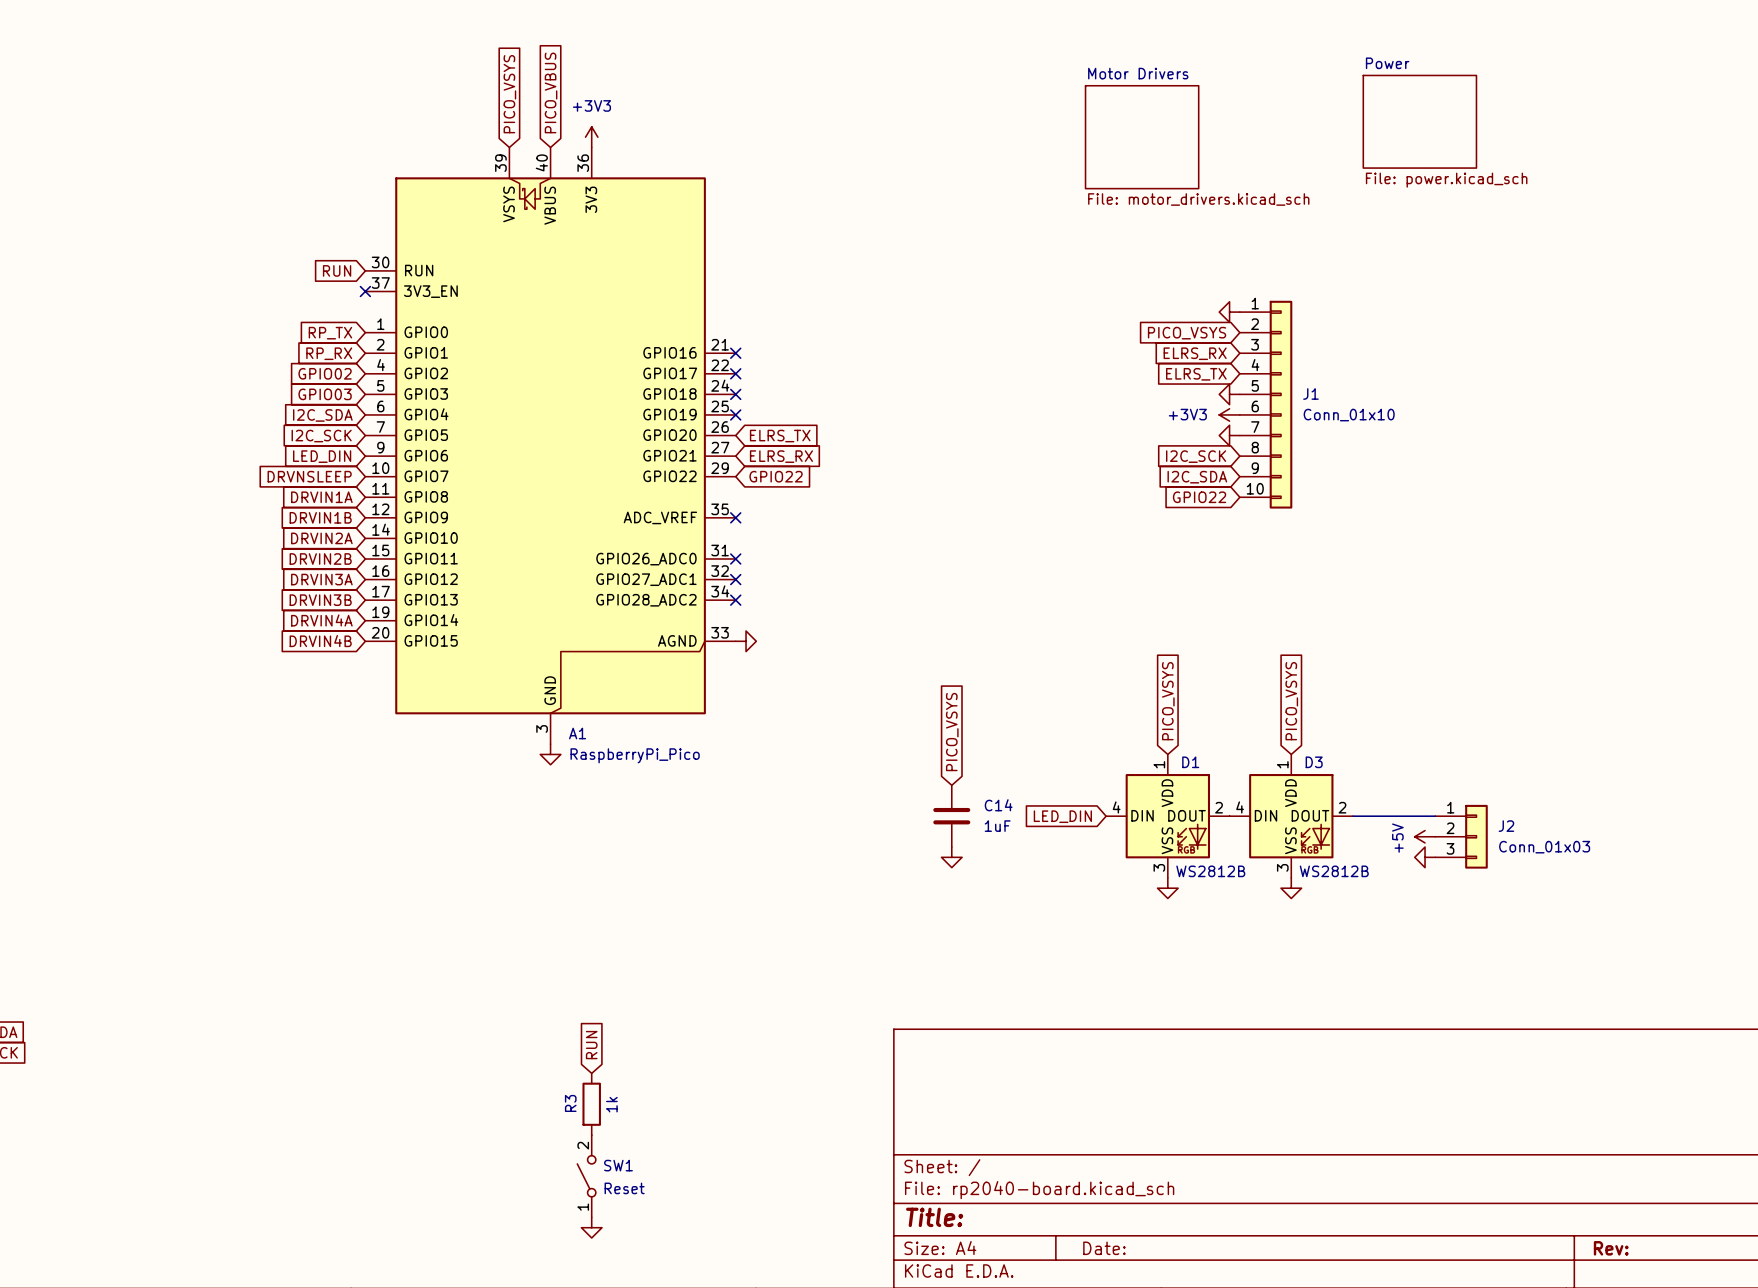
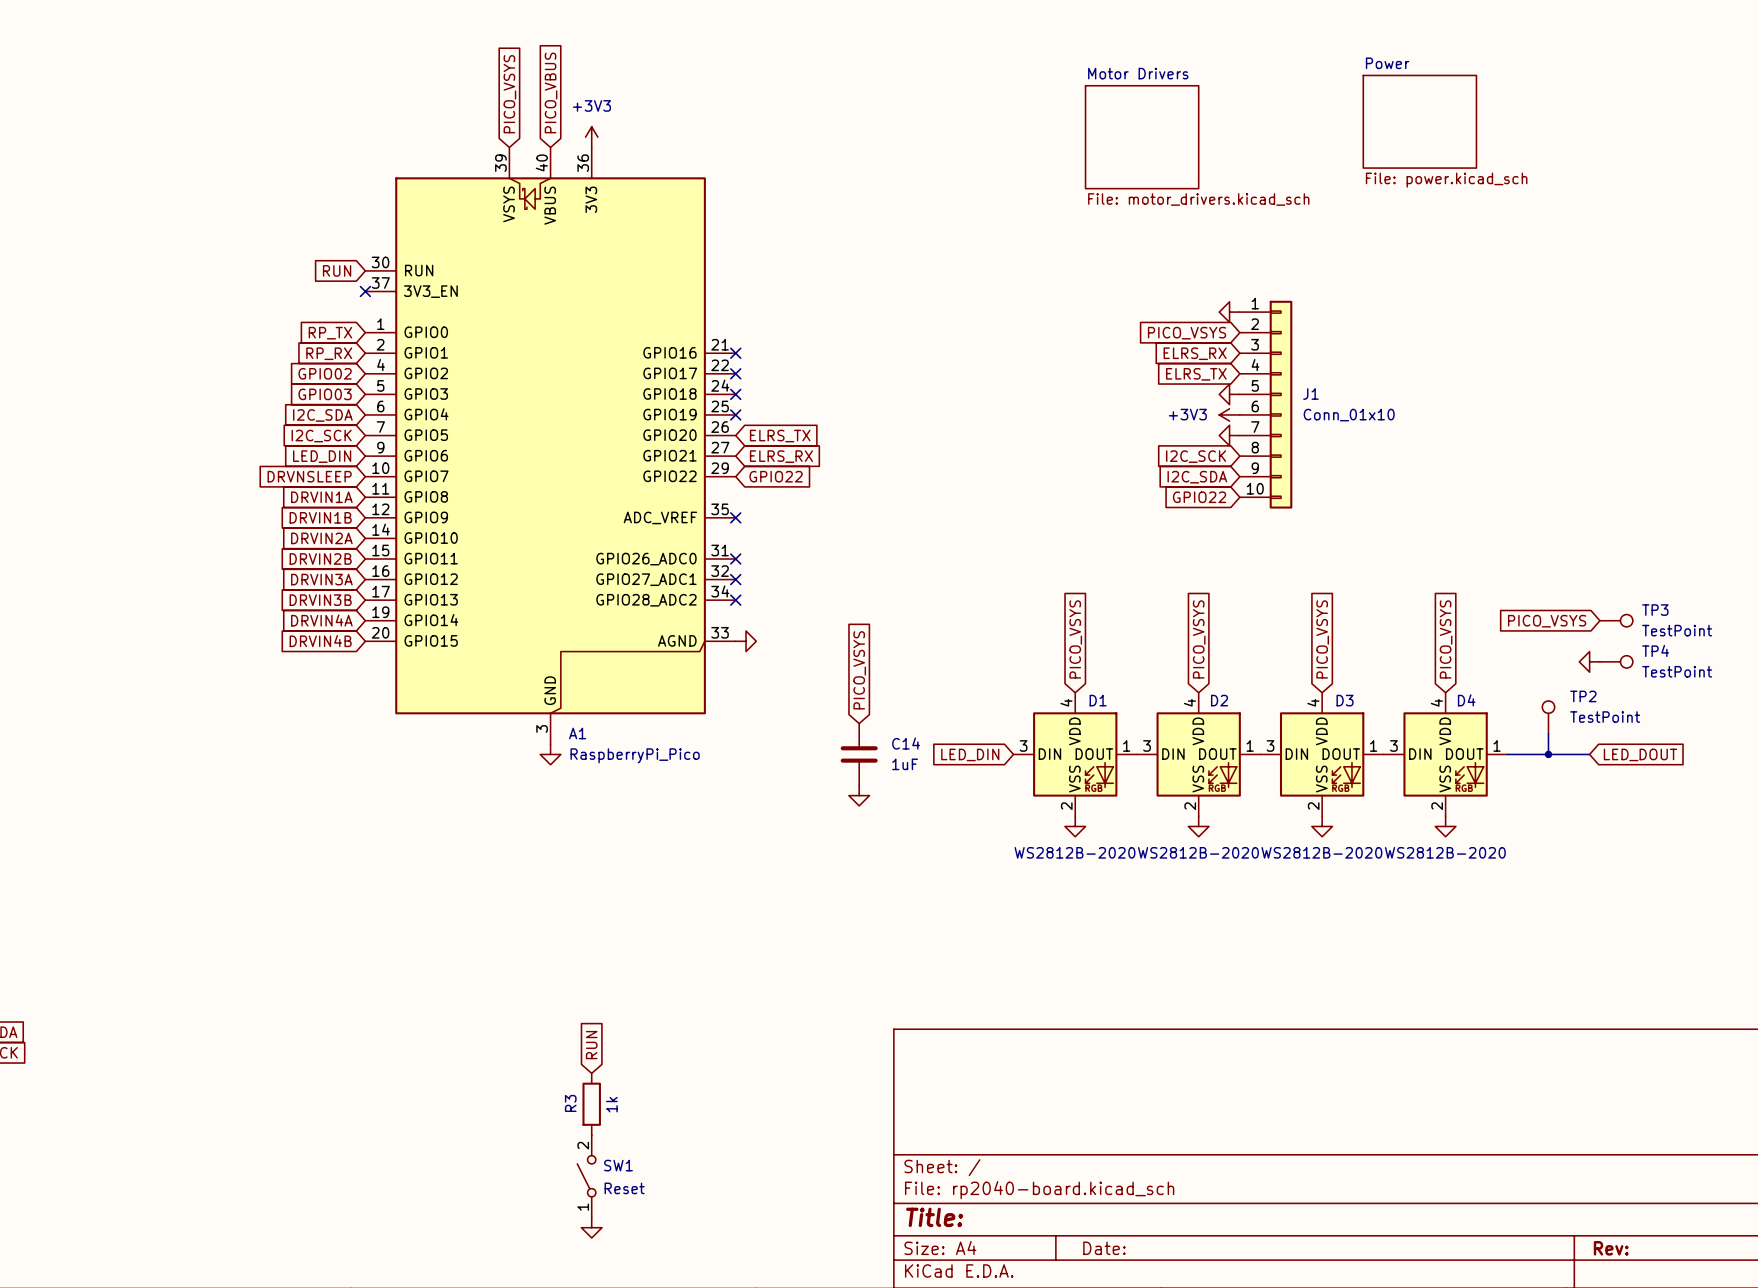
TP3: none -> TestPoint (1616, 620)
global label: none -> PICO_VSYS (1547, 621)
global label: none -> PICO_VSYS (1075, 639)
global label: none -> PICO_VSYS (1199, 639)
global label: none -> PICO_VSYS (1322, 639)
global label: none -> PICO_VSYS (1446, 639)
power symbol: none -> (1589, 661)
TP4: none -> TestPoint (1616, 661)
global label: none -> PICO_VSYS (859, 670)
global label: PICO_VSYS (1168, 701) -> none
global label: PICO_VSYS (1291, 701) -> none
TP2: none -> TestPoint (1548, 717)
global label: PICO_VSYS (952, 732) -> none
wire: none -> (1548, 733) (1548, 754)
D2: none -> WS2812B-2020 (1198, 754)
D4: none -> WS2812B-2020 (1445, 754)
junction: none -> (1548, 754)
global label: none -> LED_DOUT (1640, 754)
D1 pin number: 1 (1159, 764) -> 4 (1066, 702)
D3 pin number: 1 (1282, 764) -> 4 (1313, 702)
power symbol: none -> (859, 795)
D1 pin number: 4 (1116, 807) -> 3 (1023, 745)
D1 pin number: 2 (1219, 807) -> 1 (1126, 745)
D3 pin number: 4 (1240, 807) -> 3 (1270, 745)
D3 pin number: 2 (1342, 807) -> 1 (1373, 745)
C14 position: (951, 816) -> (859, 754)
global label position: LED_DIN (1062, 816) -> LED_DIN (970, 754)
D1 position: (1167, 816) -> (1075, 754)
D3 position: (1291, 816) -> (1322, 754)
wire: (1353, 816) (1435, 816) -> (1507, 754) (1589, 754)
power symbol: none -> (1075, 826)
power symbol: none -> (1198, 826)
power symbol: none -> (1322, 826)
power symbol: +5V (1425, 836) -> none
J2: Conn_01x03 (1461, 836) -> none
power symbol: (951, 857) -> none
power symbol rotation: 0° (1425, 857) -> 90° counterclockwise (1445, 826)
power symbol position: (1425, 857) -> (1445, 826)
D1 pin number: 3 (1159, 867) -> 2 (1066, 806)
D3 pin number: 3 (1282, 867) -> 2 (1313, 806)
D1 value: WS2812B (1210, 871) -> WS2812B-2020 (1074, 852)
D3 value: WS2812B (1334, 871) -> WS2812B-2020 (1321, 852)
power symbol: (1167, 888) -> none
power symbol: (1291, 888) -> none

